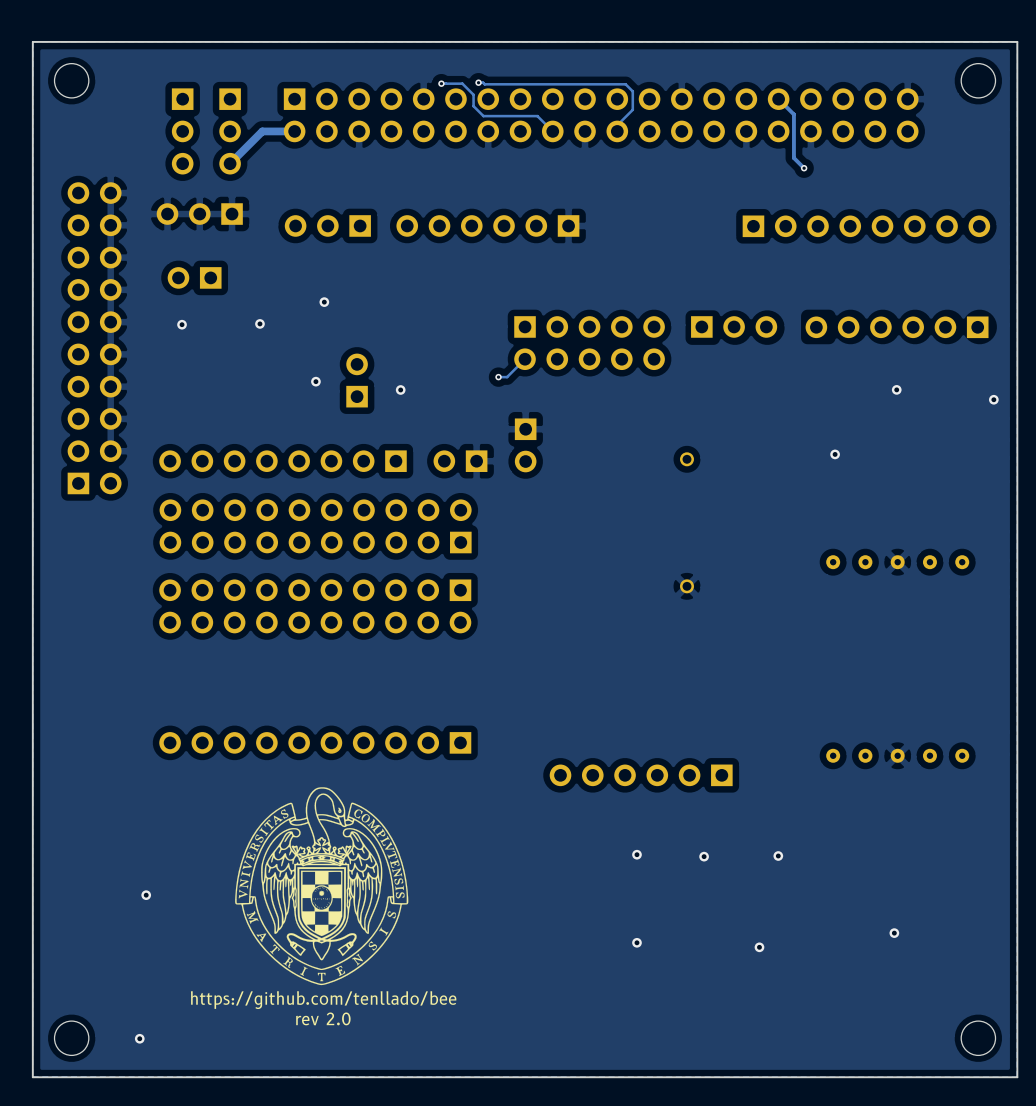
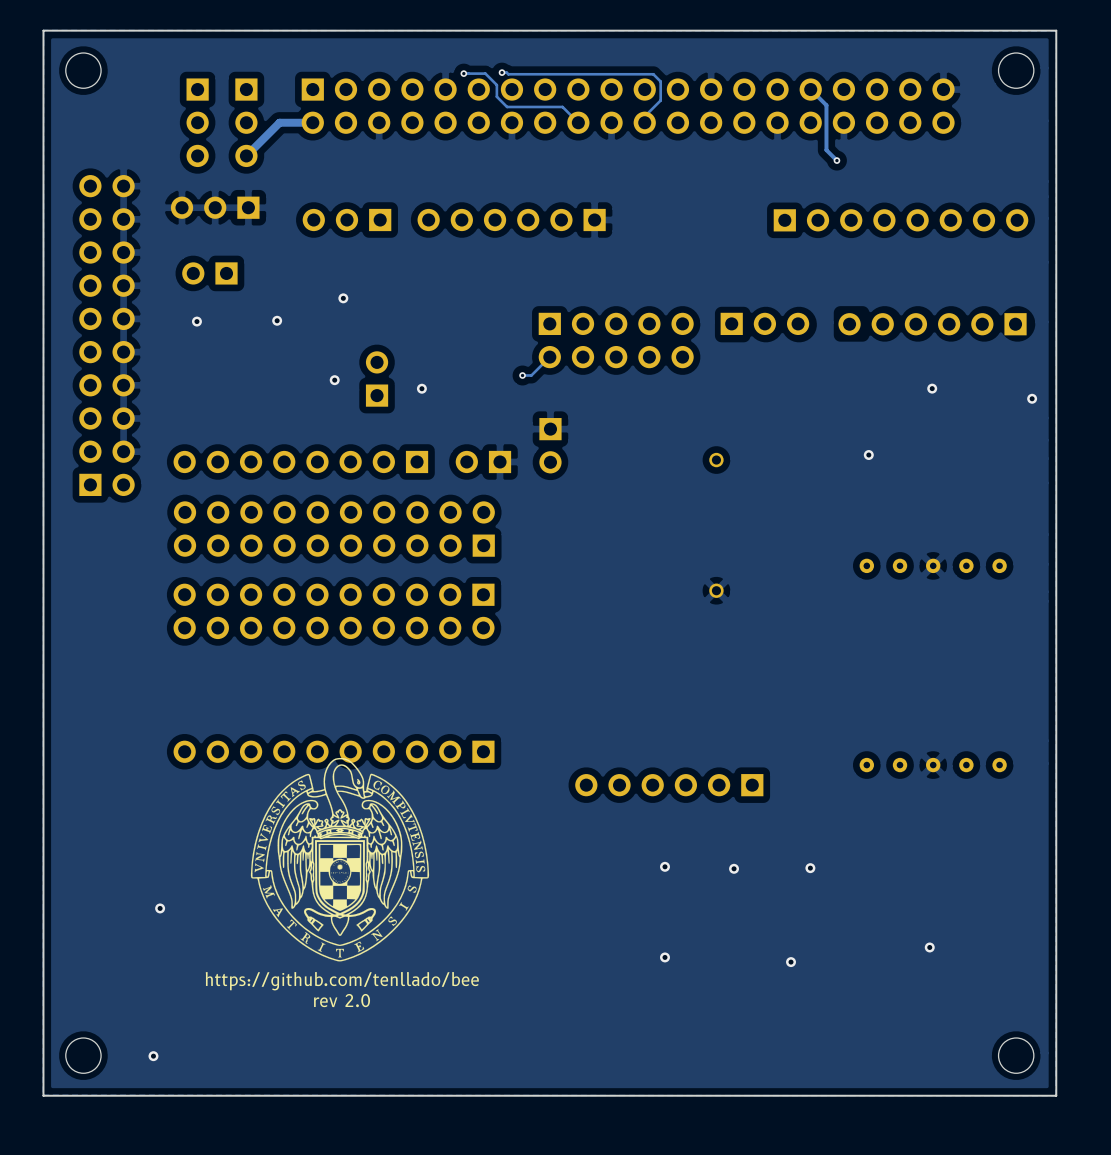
drawing position: (321, 886) -> (339, 859)
text position: https://github.com/tenllado/bee (323, 1000) -> https://github.com/tenllado/bee (342, 981)
text position: rev 2.0 (323, 1018) -> rev 2.0 (342, 1000)

